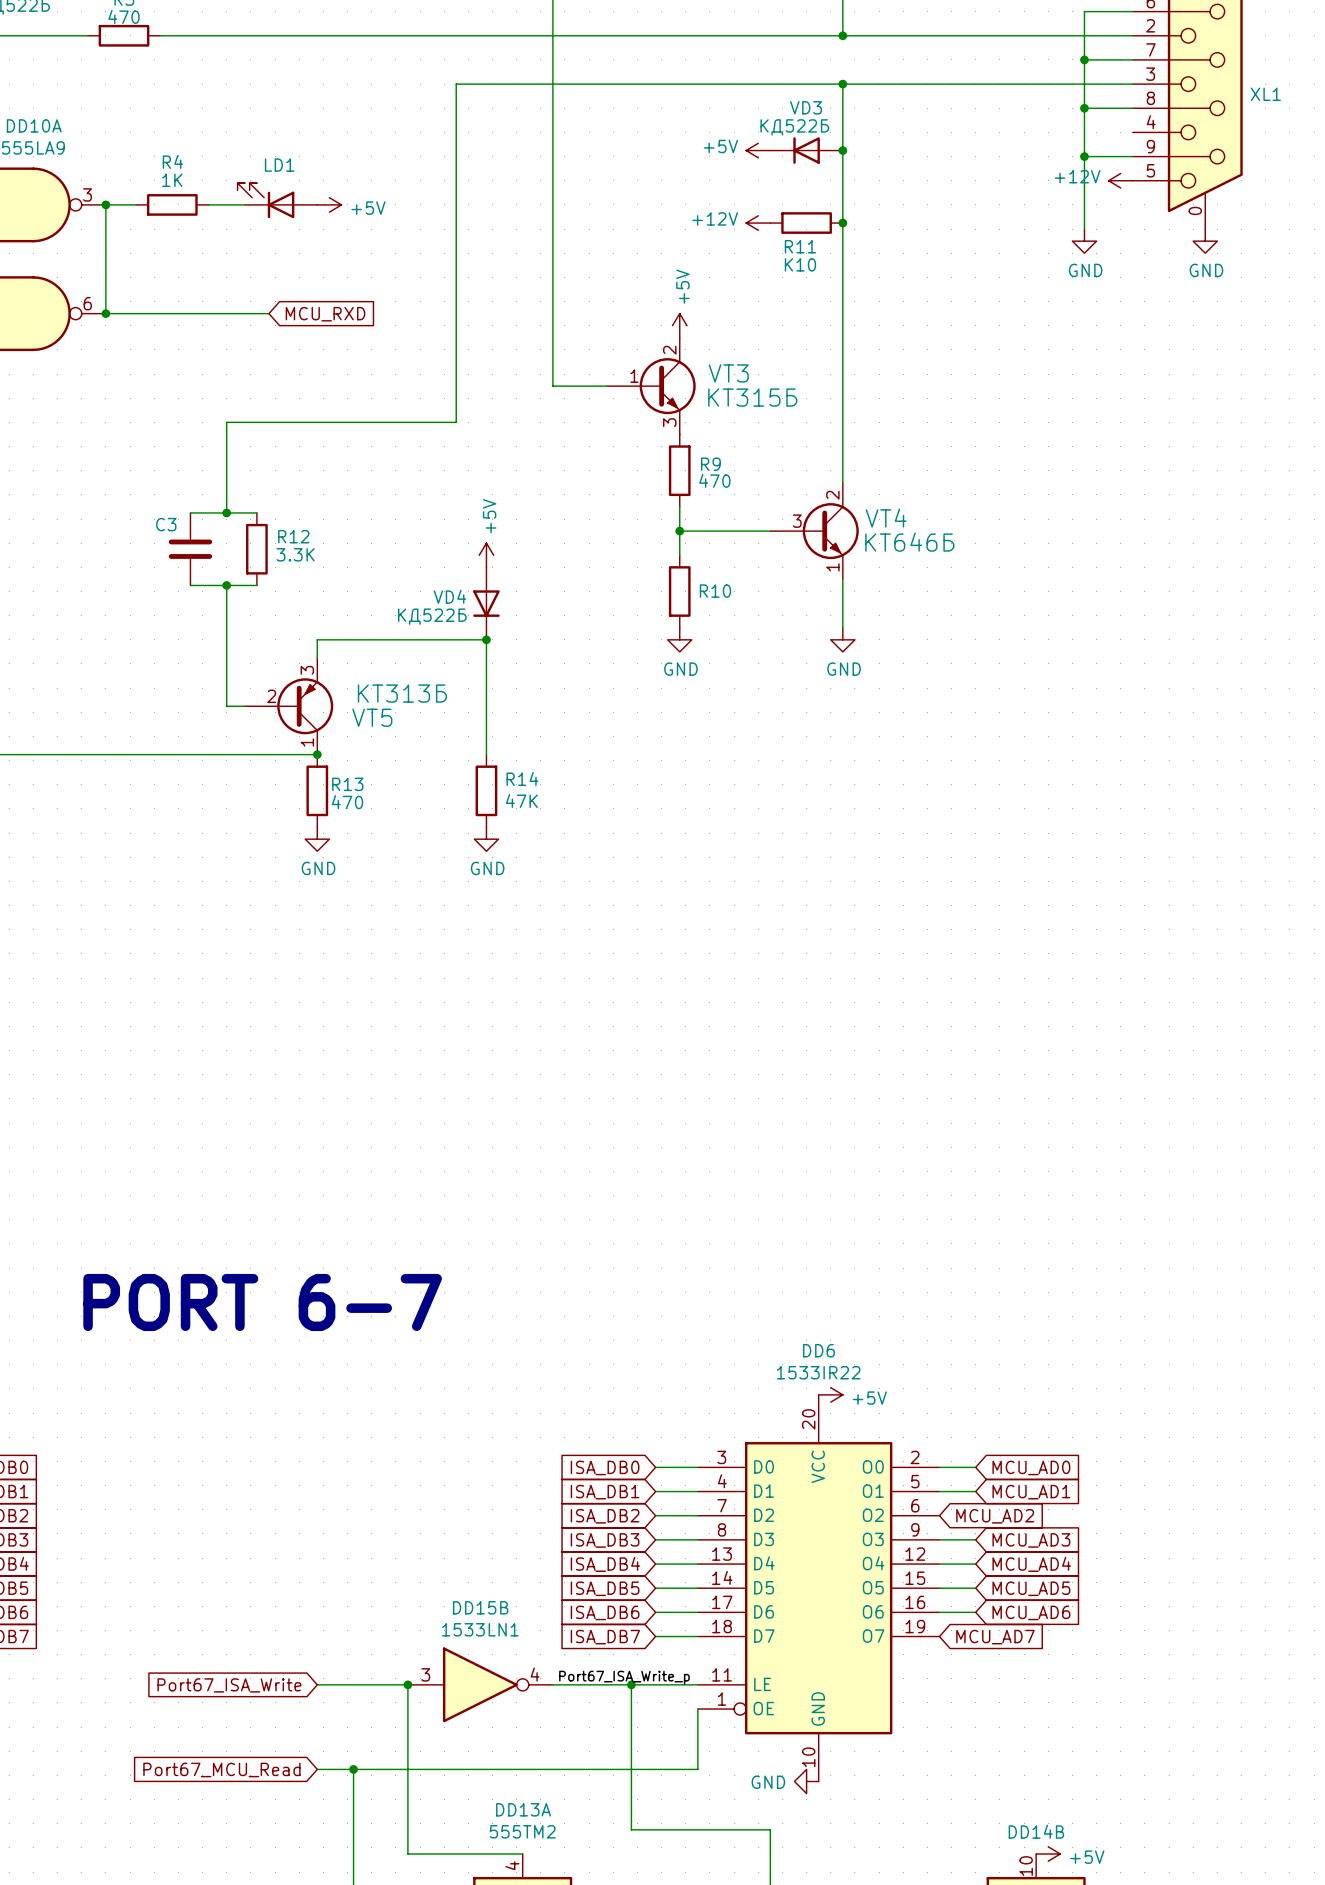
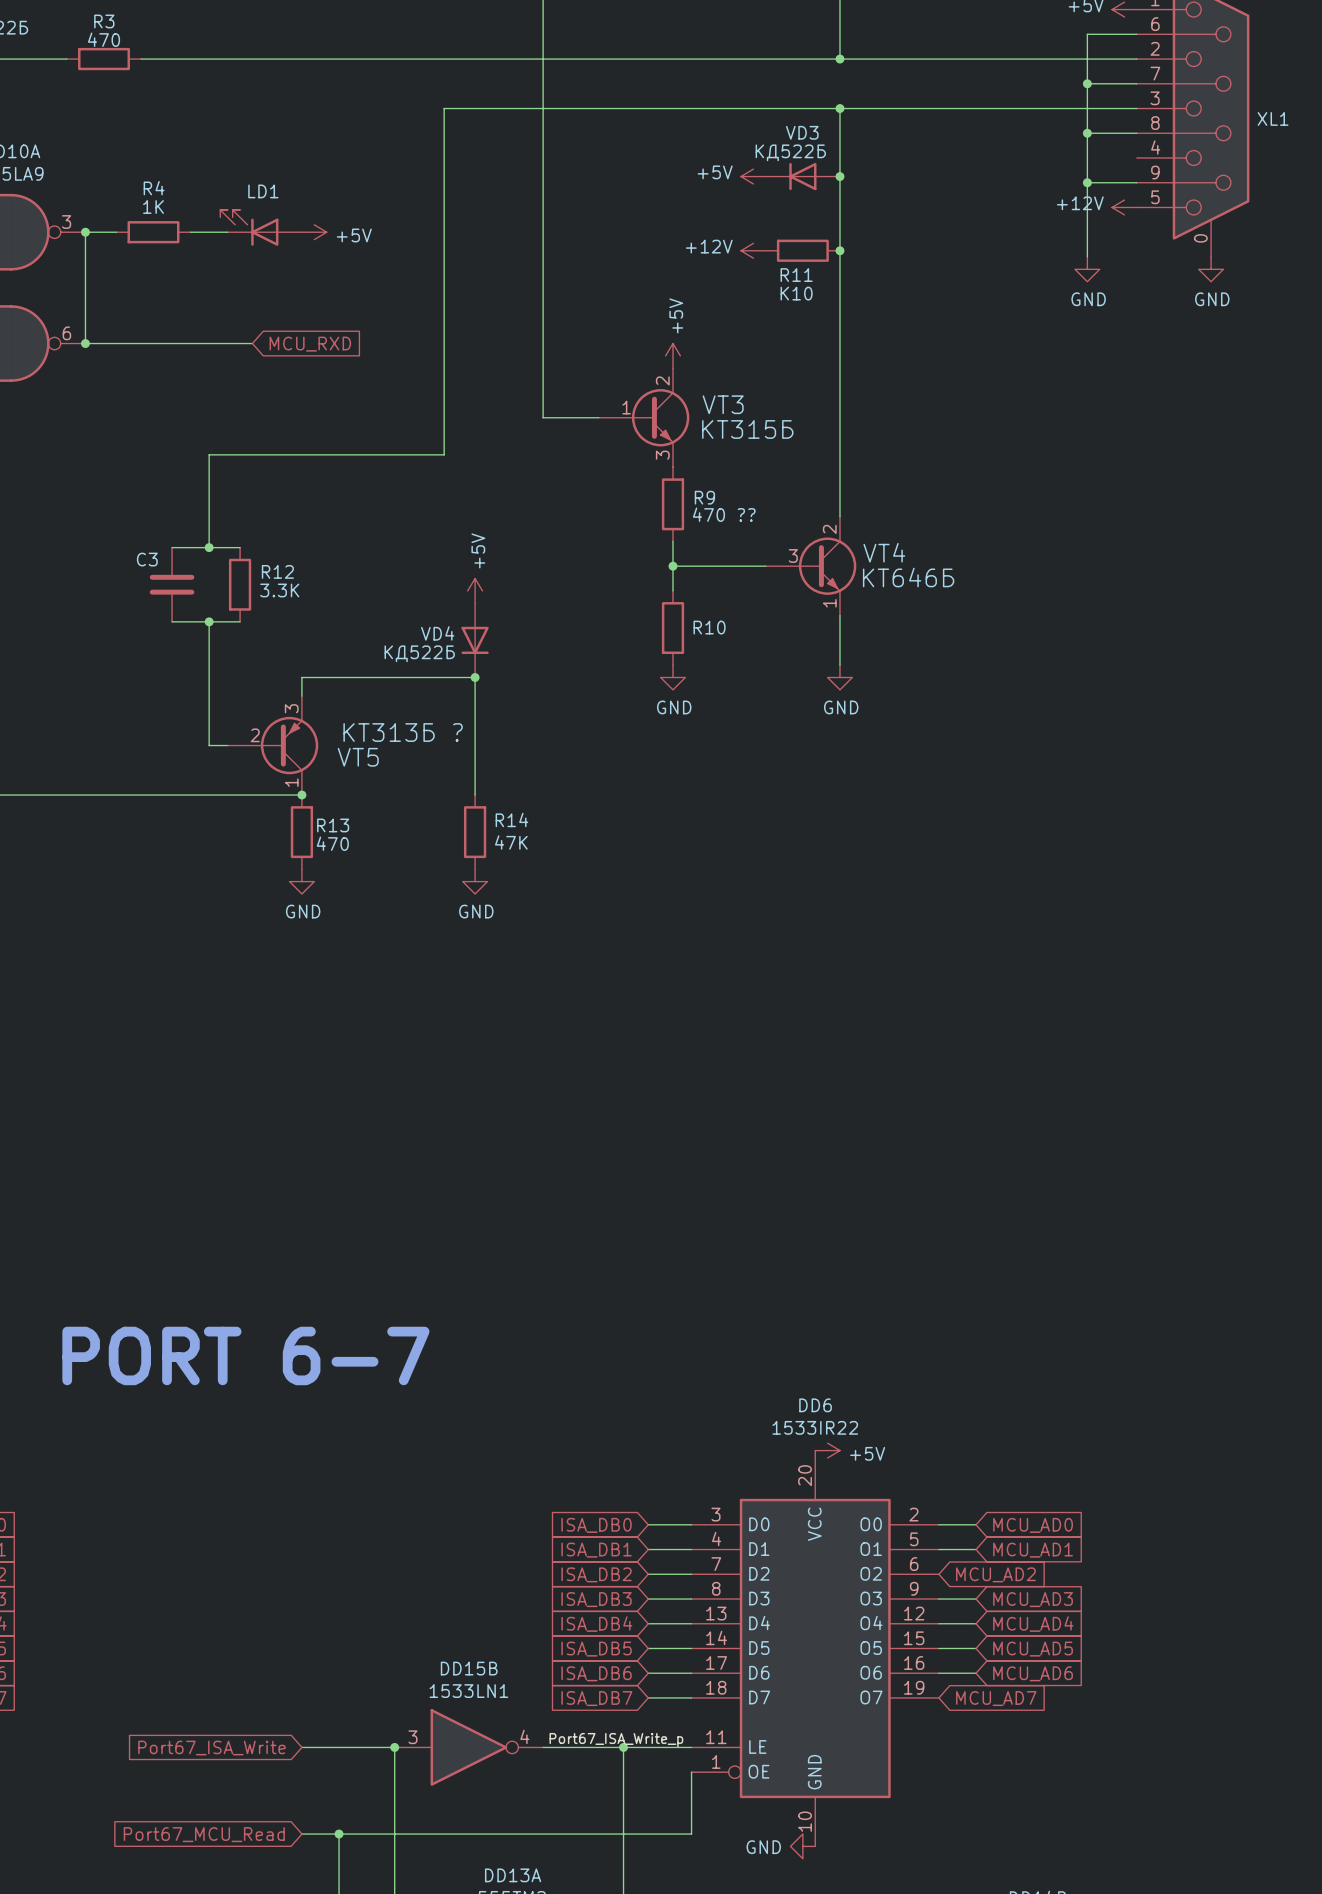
R9 value: 470 (714, 480) -> 470 ?? (724, 514)
VT5 value: КТ313Б (402, 693) -> КТ313Б ? (403, 732)

